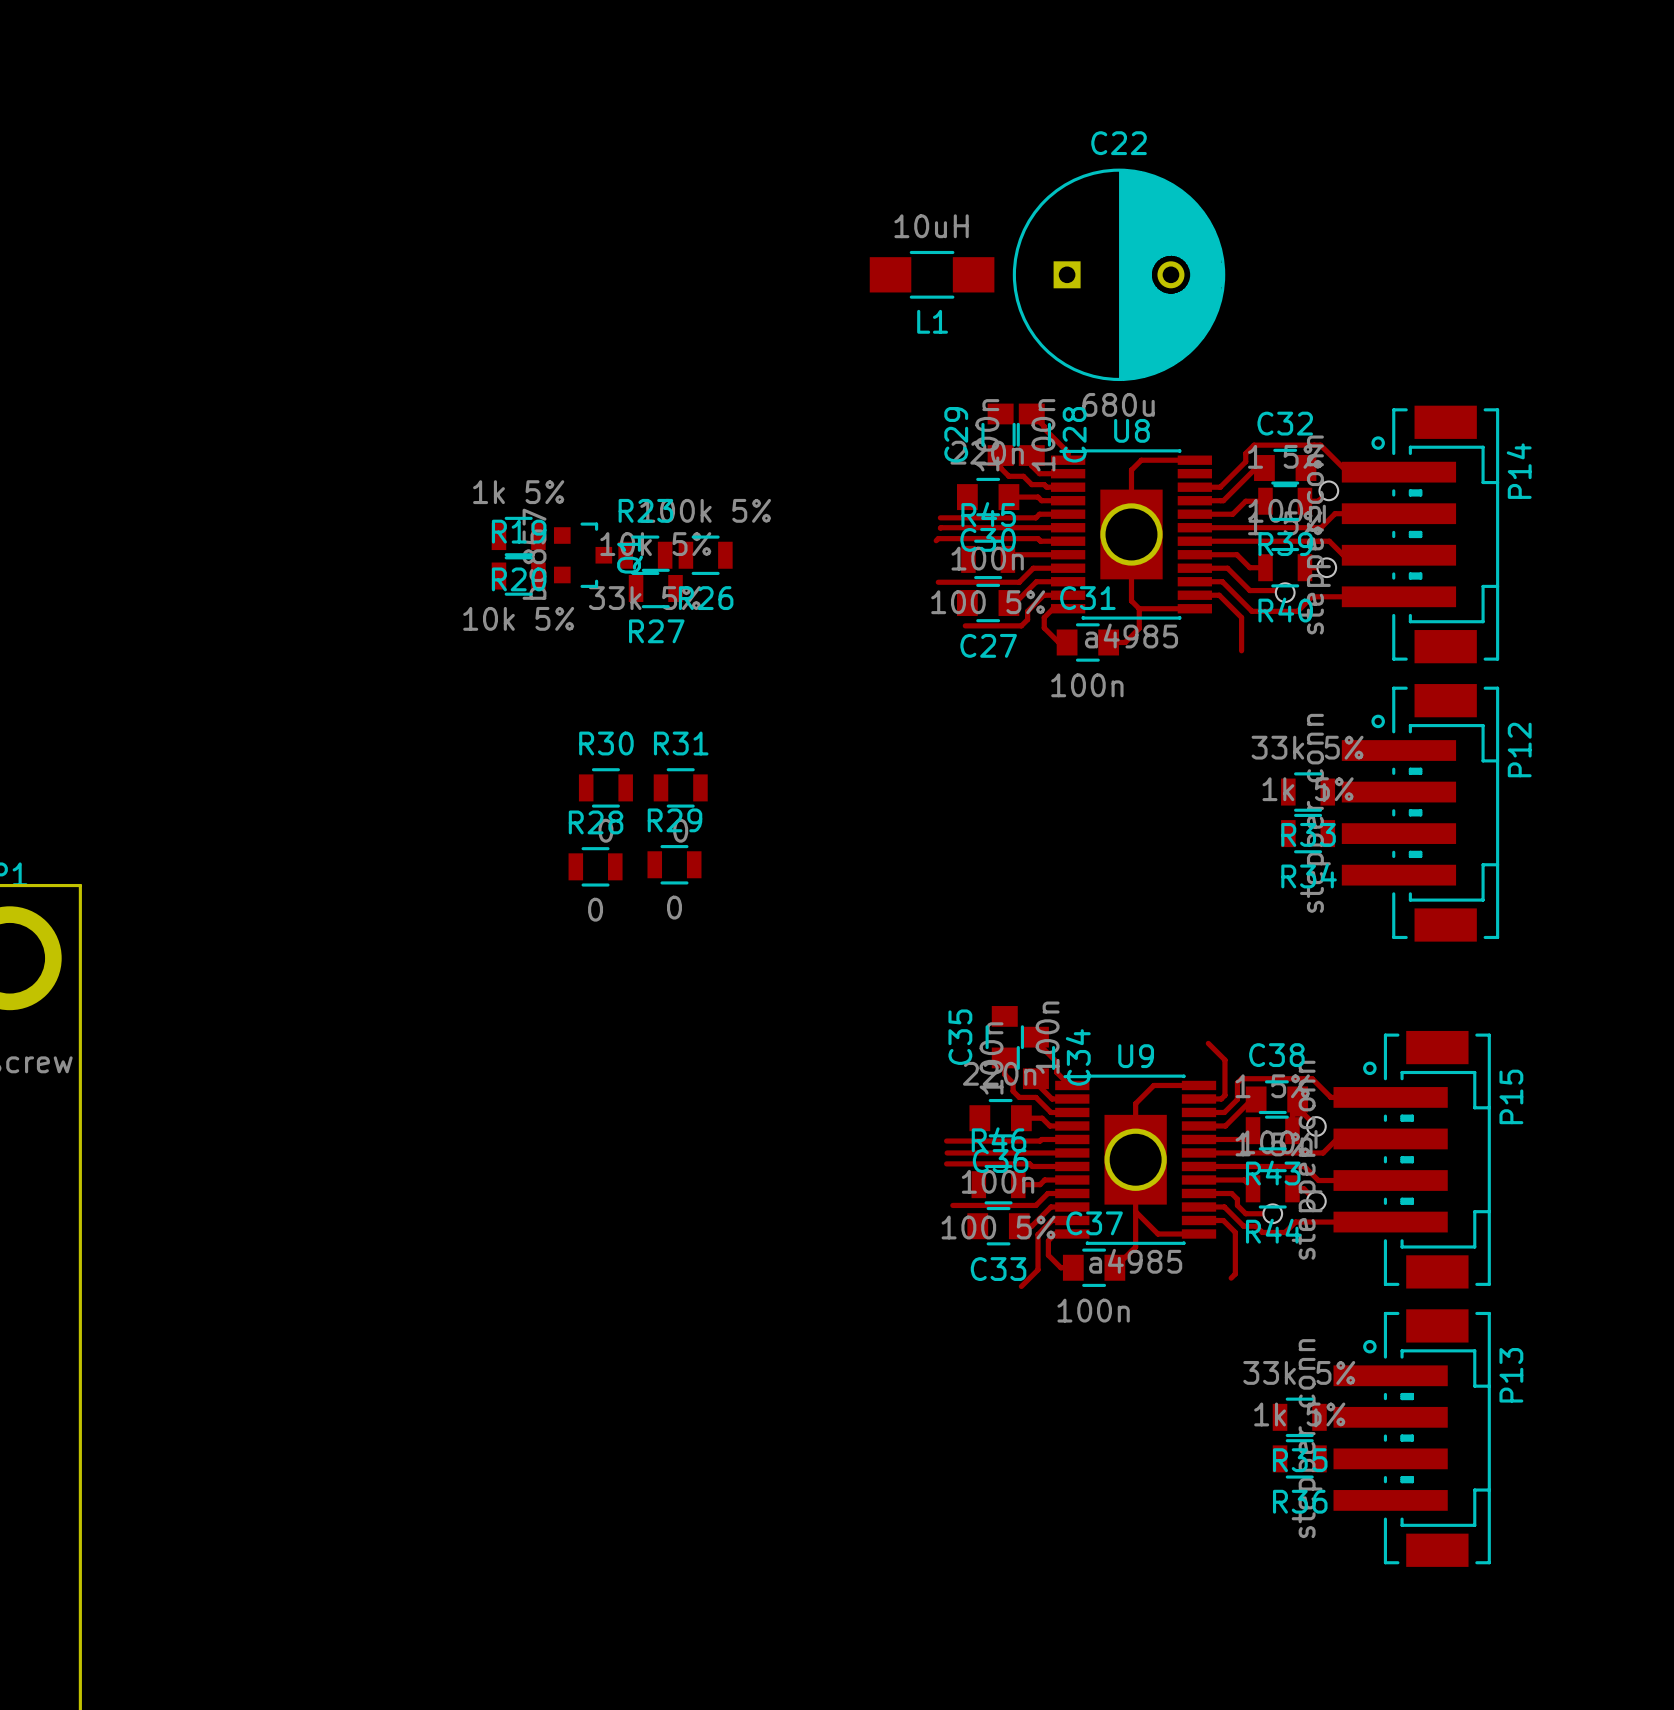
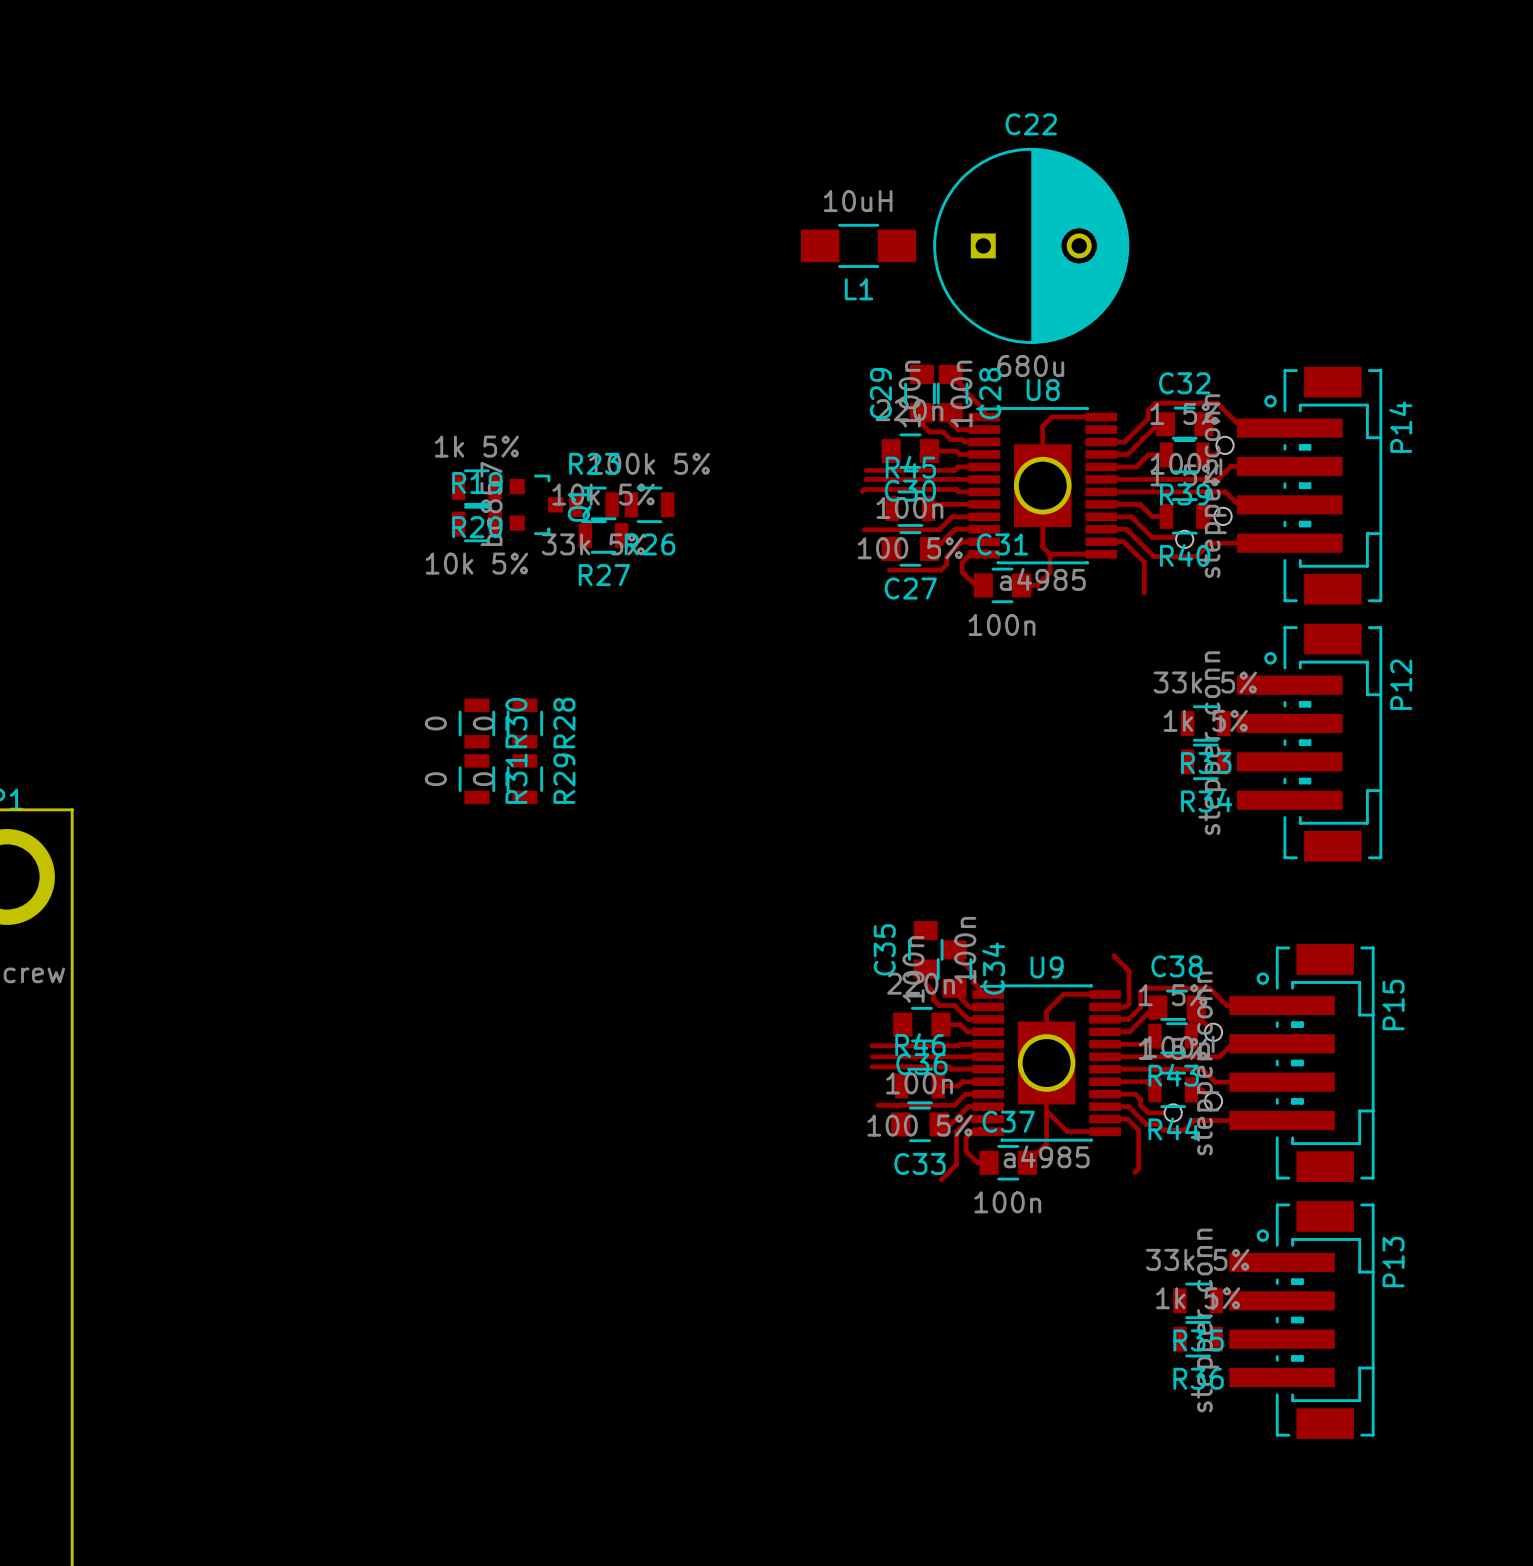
R30 rotation: 0° (605, 787) -> 90° clockwise (476, 723)
R30 position: (605, 787) -> (476, 723)
R31 rotation: 0° (680, 787) -> 90° clockwise (476, 779)
R31 position: (680, 787) -> (476, 779)
R29 rotation: 0° (674, 864) -> 90° clockwise (524, 779)
R29 position: (674, 864) -> (524, 779)
R28 rotation: 0° (595, 866) -> 90° clockwise (524, 723)
R28 position: (595, 866) -> (524, 723)

